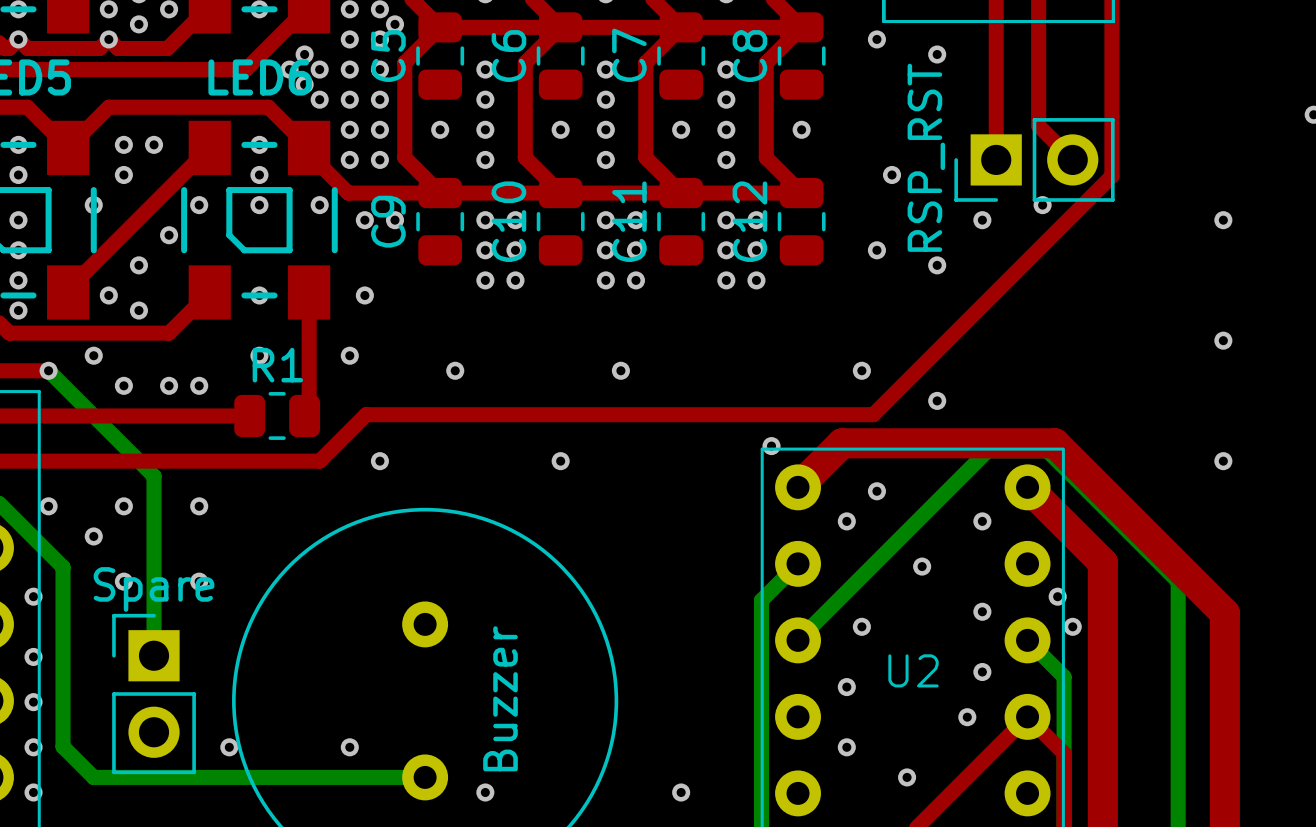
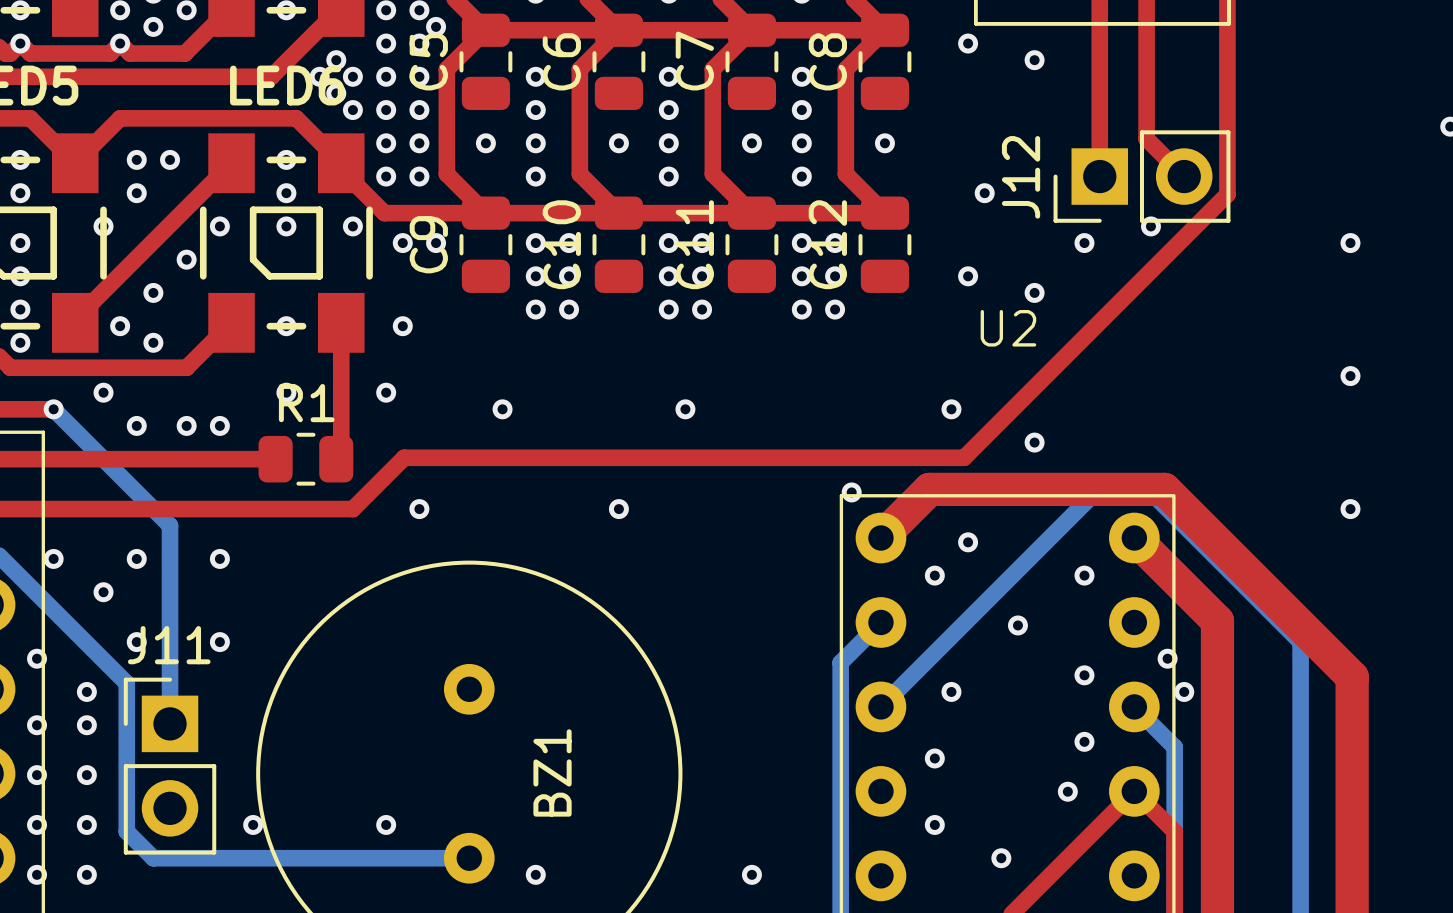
RSP_RST name: RSP_RST (926, 157) -> J12 (1021, 177)
bottom track: (63, 567) (63, 746) (93, 777) (138, 777) -> (69, 626) (126, 683) (126, 831) (153, 858)
Spare name: Spare (154, 589) -> J11 (169, 645)
via: none -> (86, 691)
via: none -> (86, 725)
U2 name position: U2 (913, 670) -> U2 (1008, 328)
Buzzer name: Buzzer (500, 698) -> BZ1 (552, 772)
via: none -> (86, 775)
via: none -> (86, 824)
via: none -> (86, 874)

